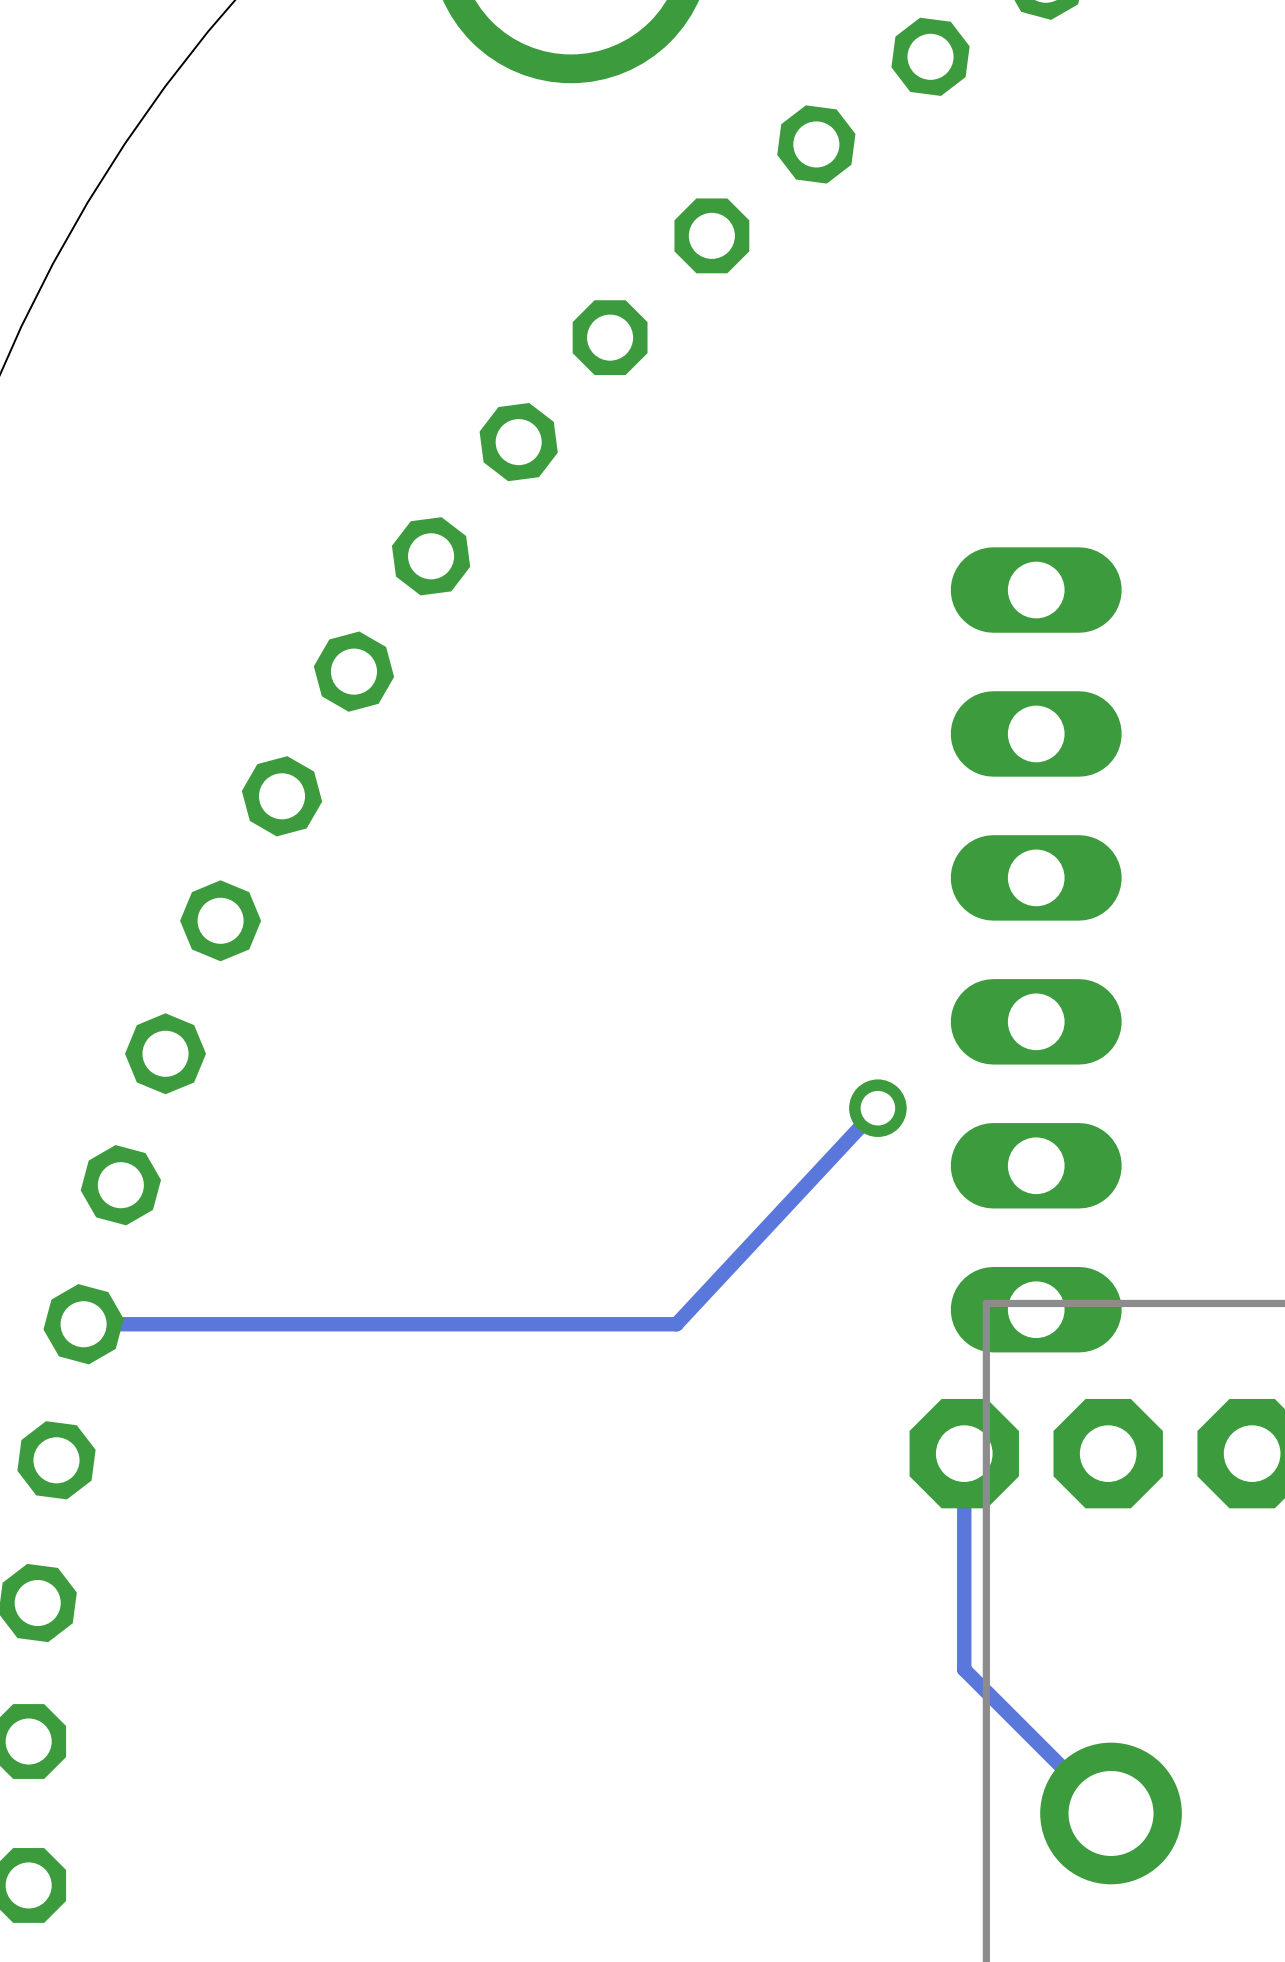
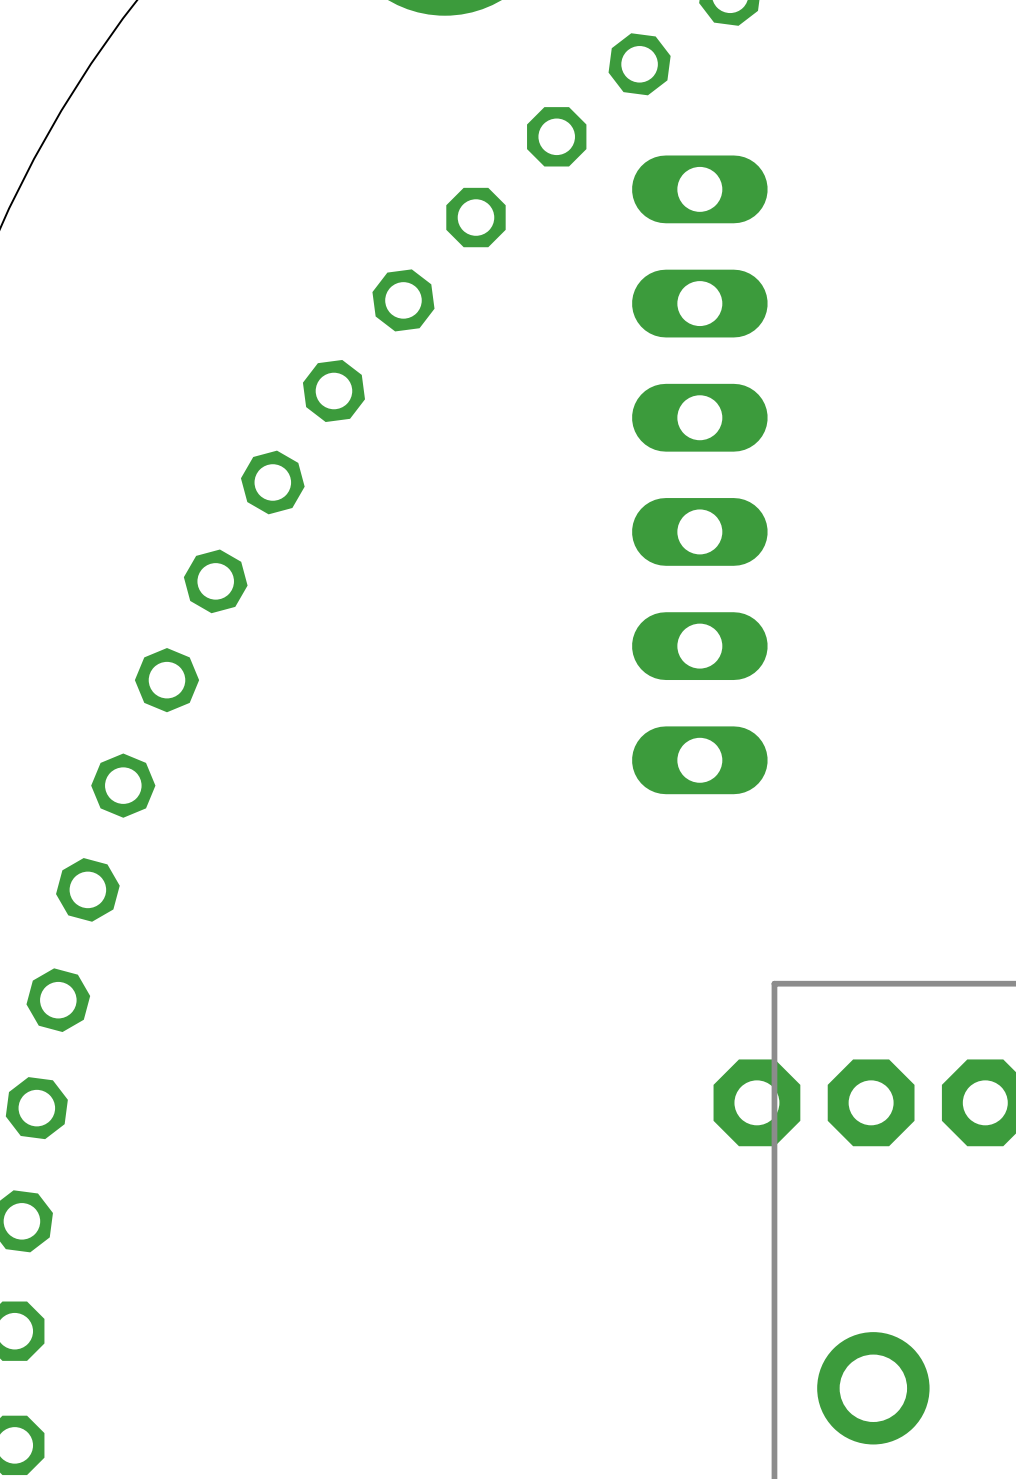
part position: (1036, 949) -> (699, 474)
track: (877, 1108) (676, 1324) (83, 1324) -> none
via: (877, 1108) -> none
track: (964, 1453) (964, 1669) (1108, 1813) -> none

